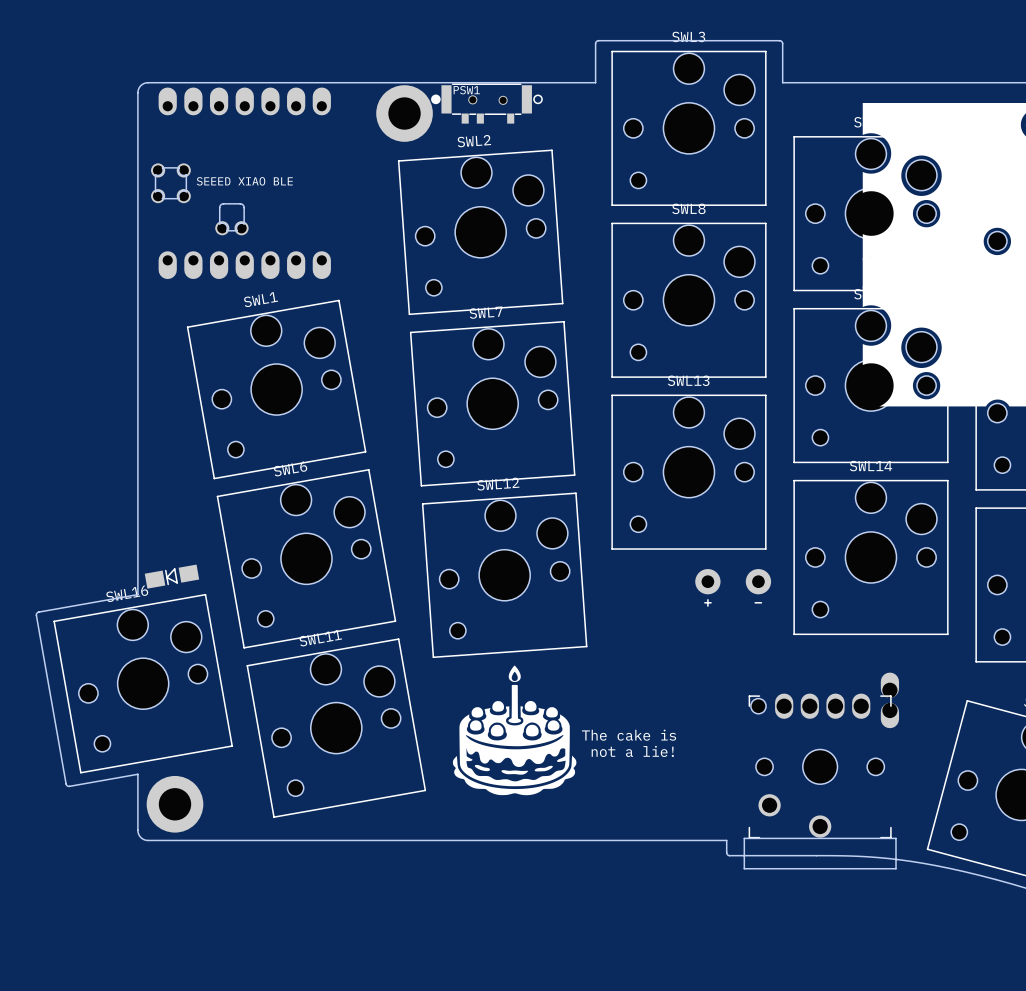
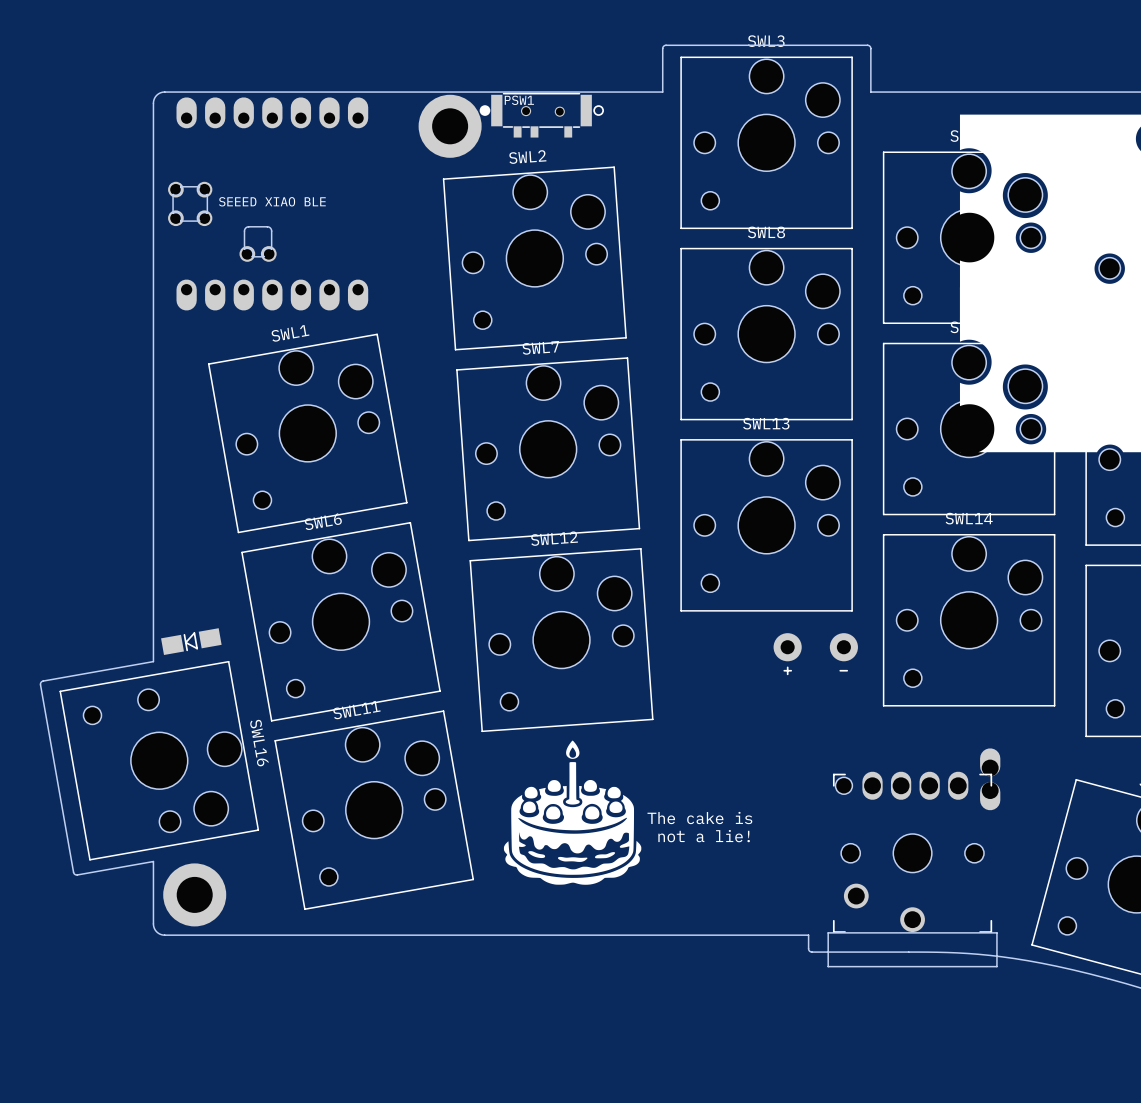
SWL16 rotation: 0° (143, 683) -> 90° clockwise (159, 760)

